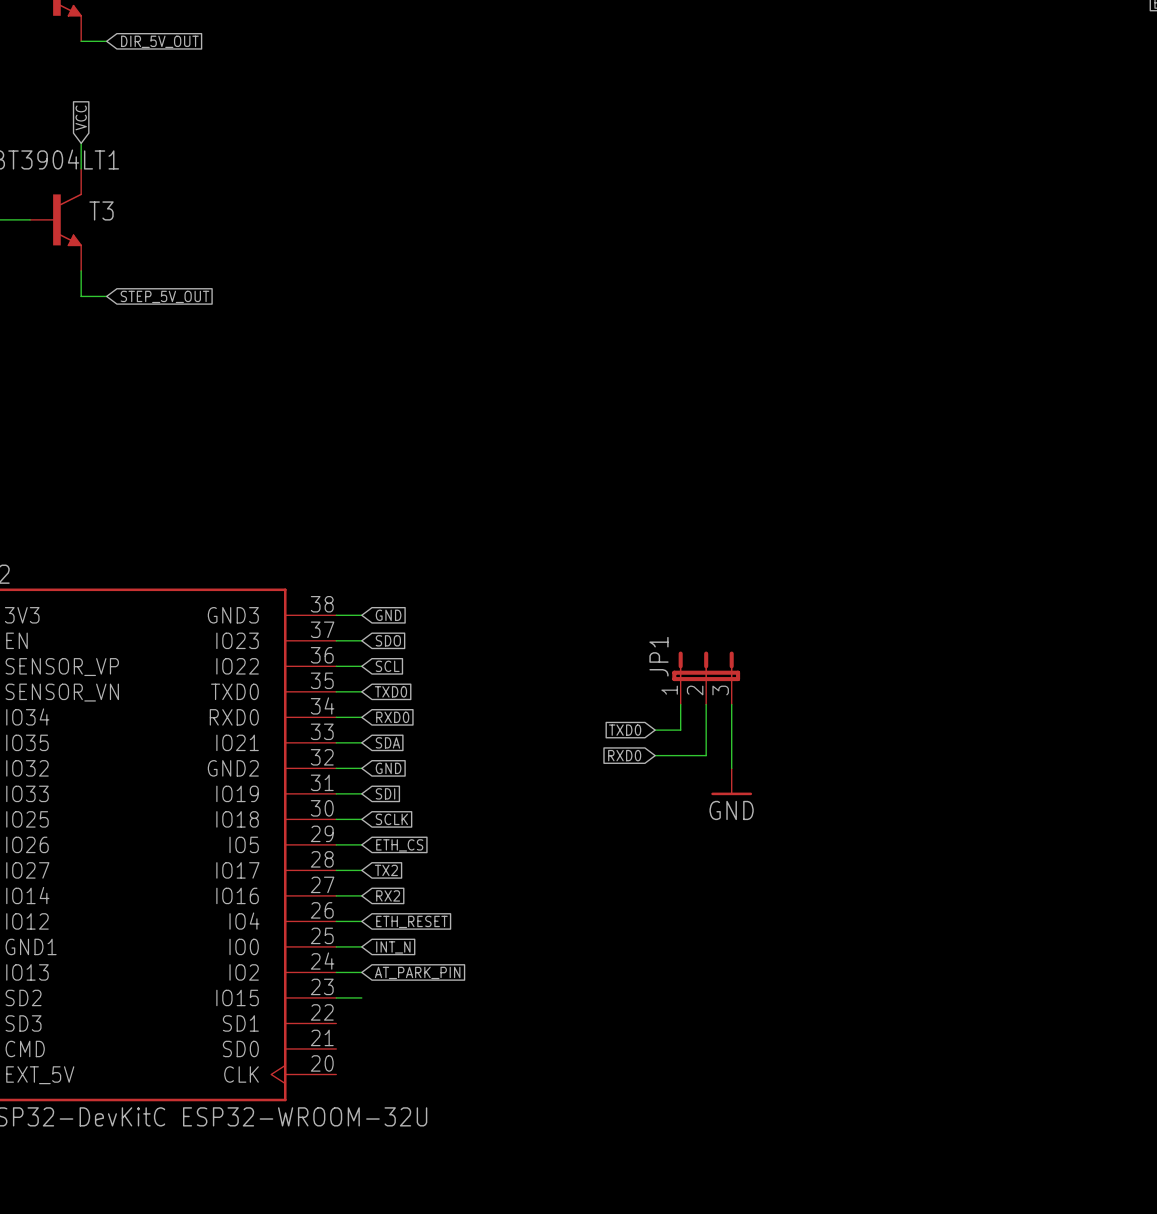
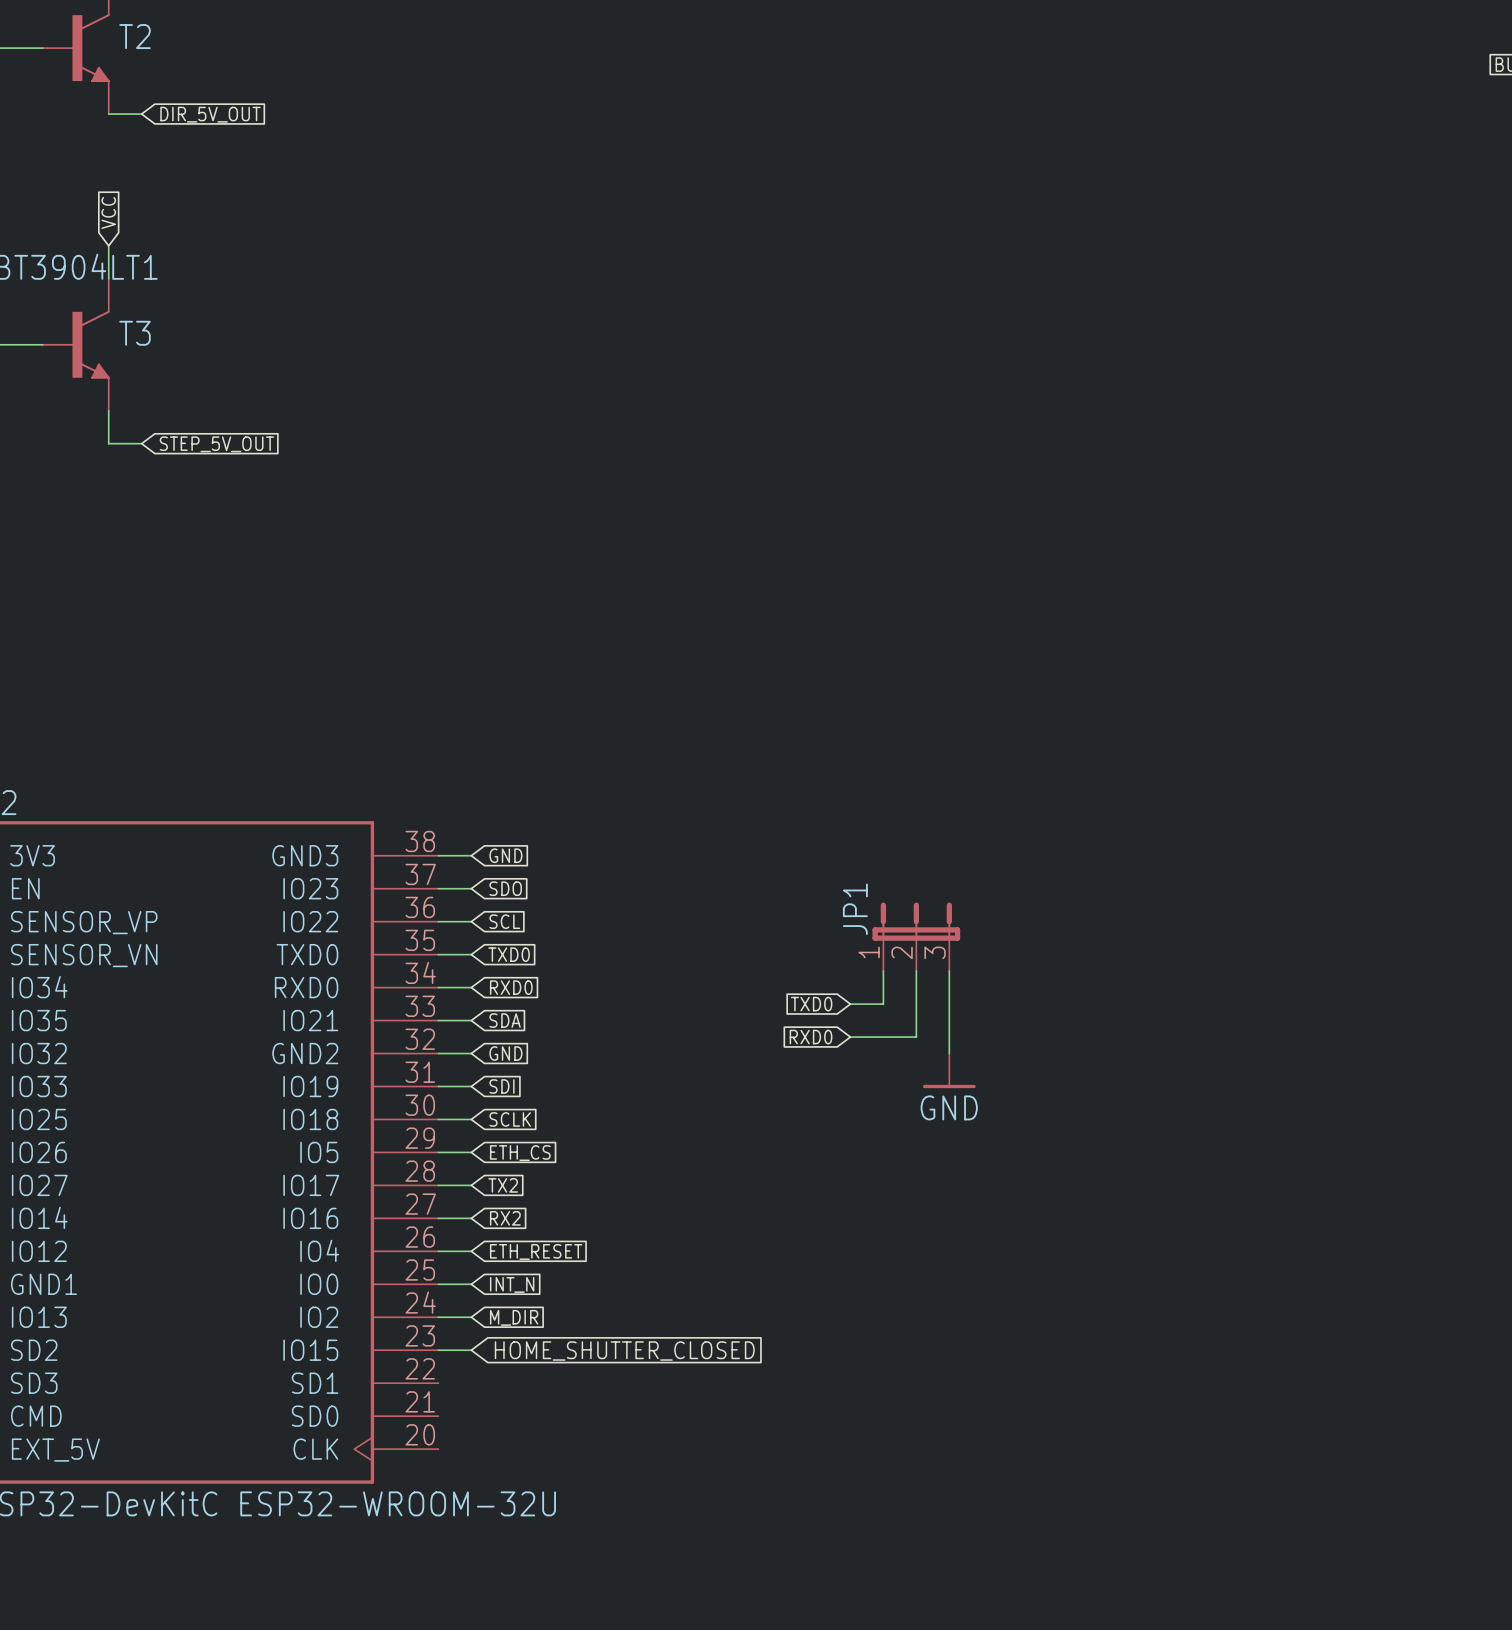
global label: AT_PARK_PIN (417, 972) -> M_DIR (514, 1317)
global label: none -> HOME_SHUTTER_CLOSED (624, 1351)

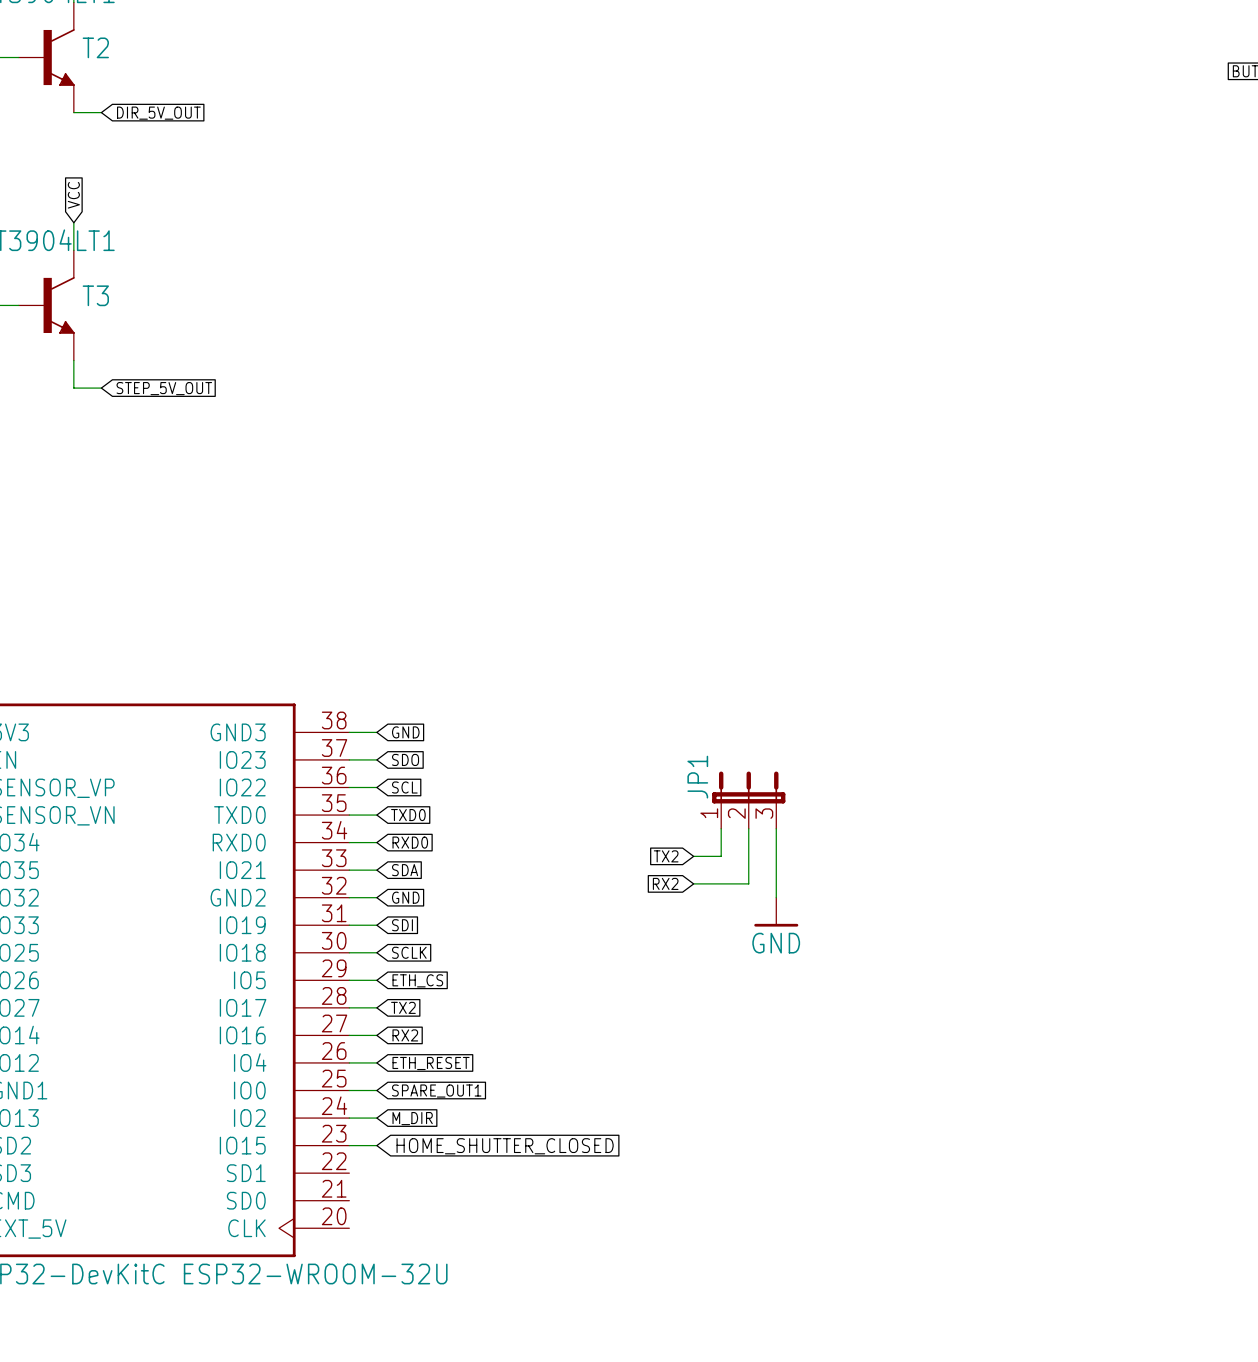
global label: TXD0 (811, 1004) -> TX2 (666, 856)
global label: RXD0 (811, 1037) -> RX2 (665, 883)
global label: INT_N (512, 1284) -> SPARE_OUT1 (436, 1091)

